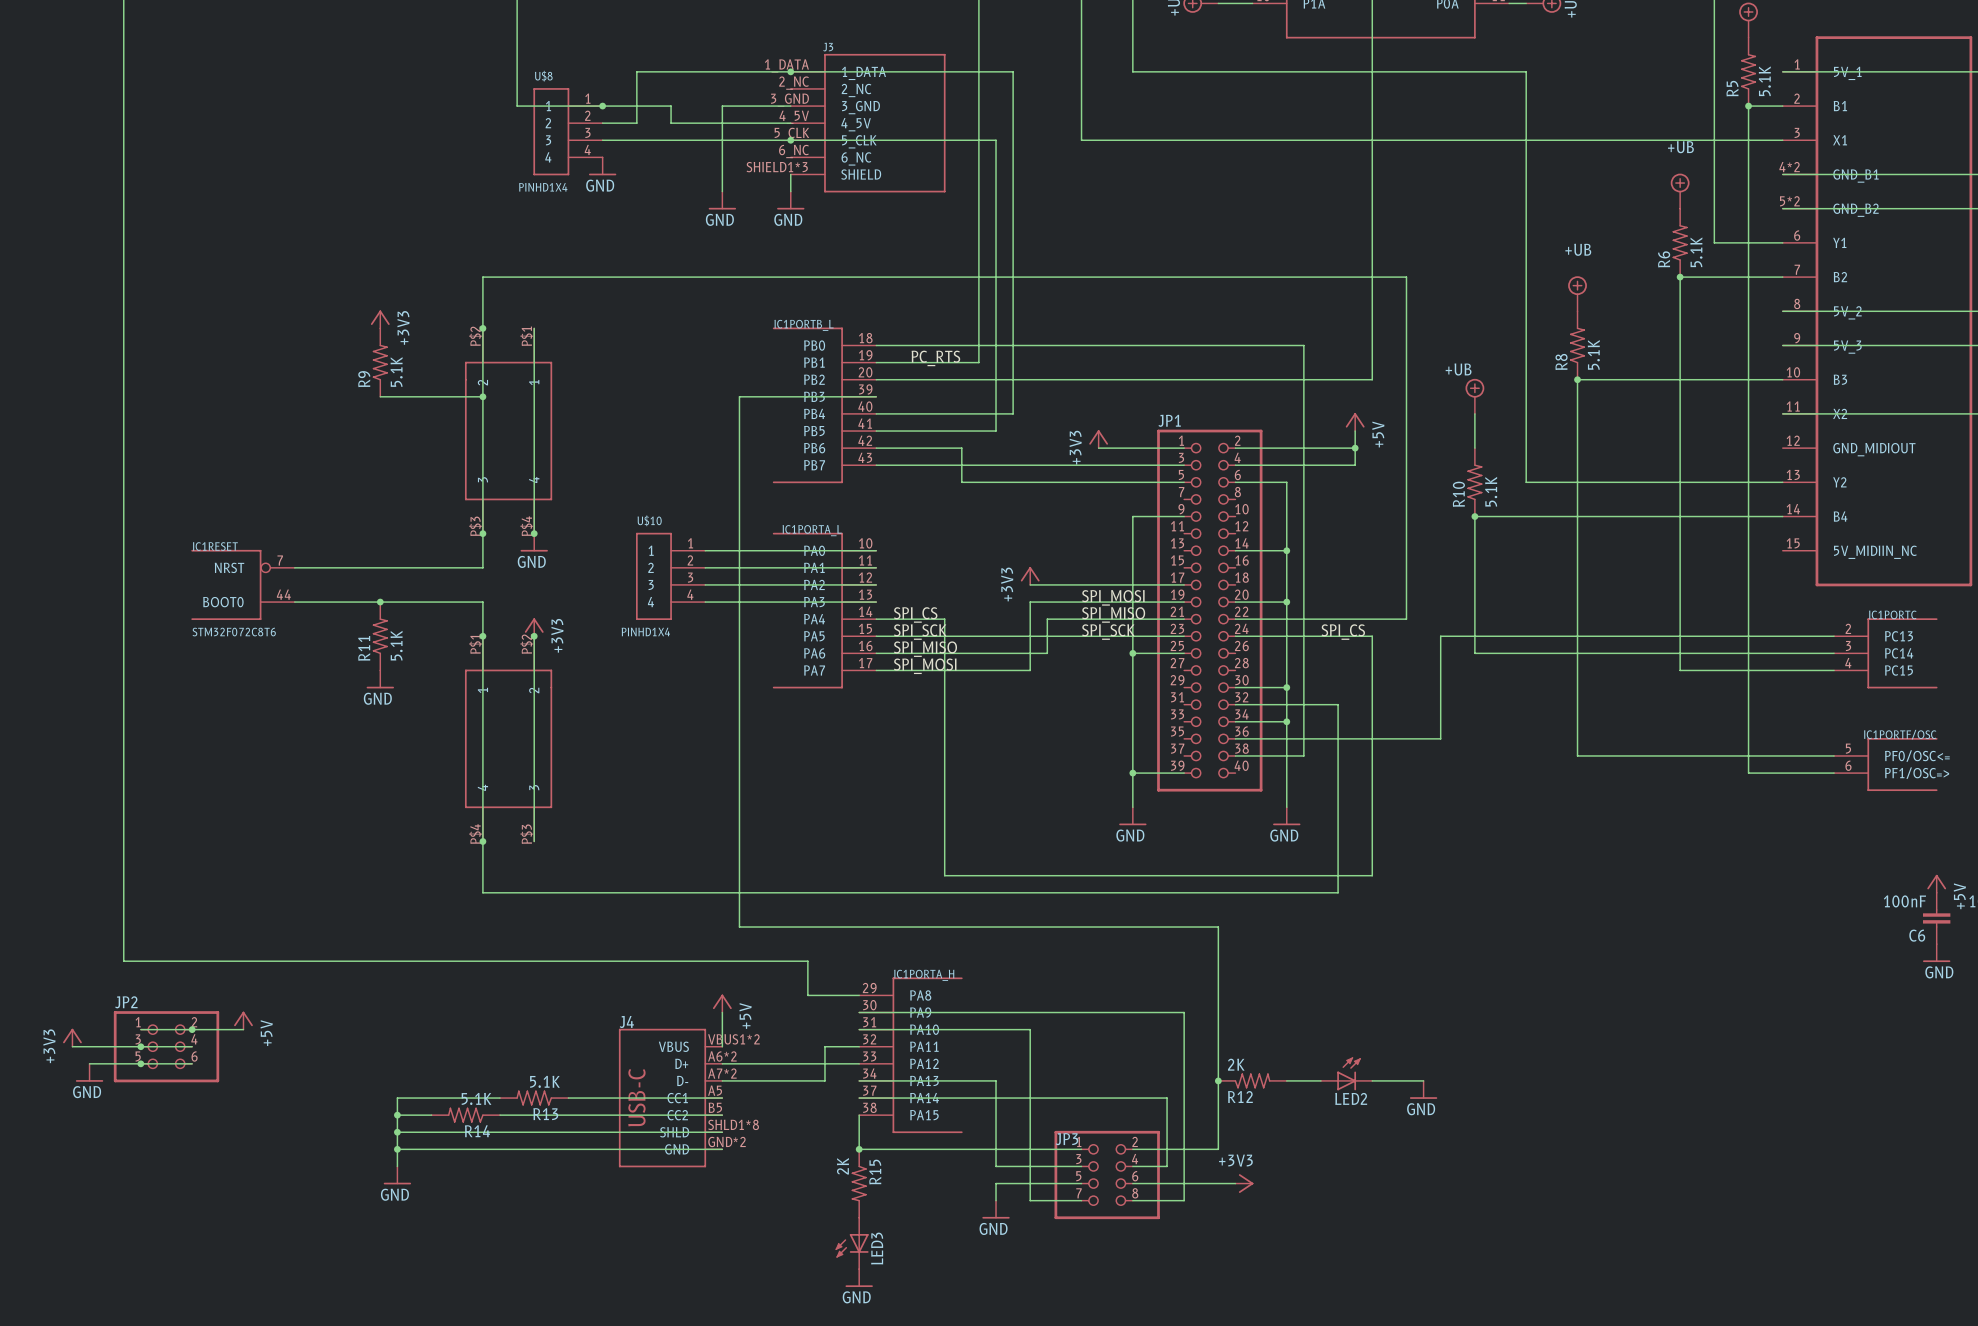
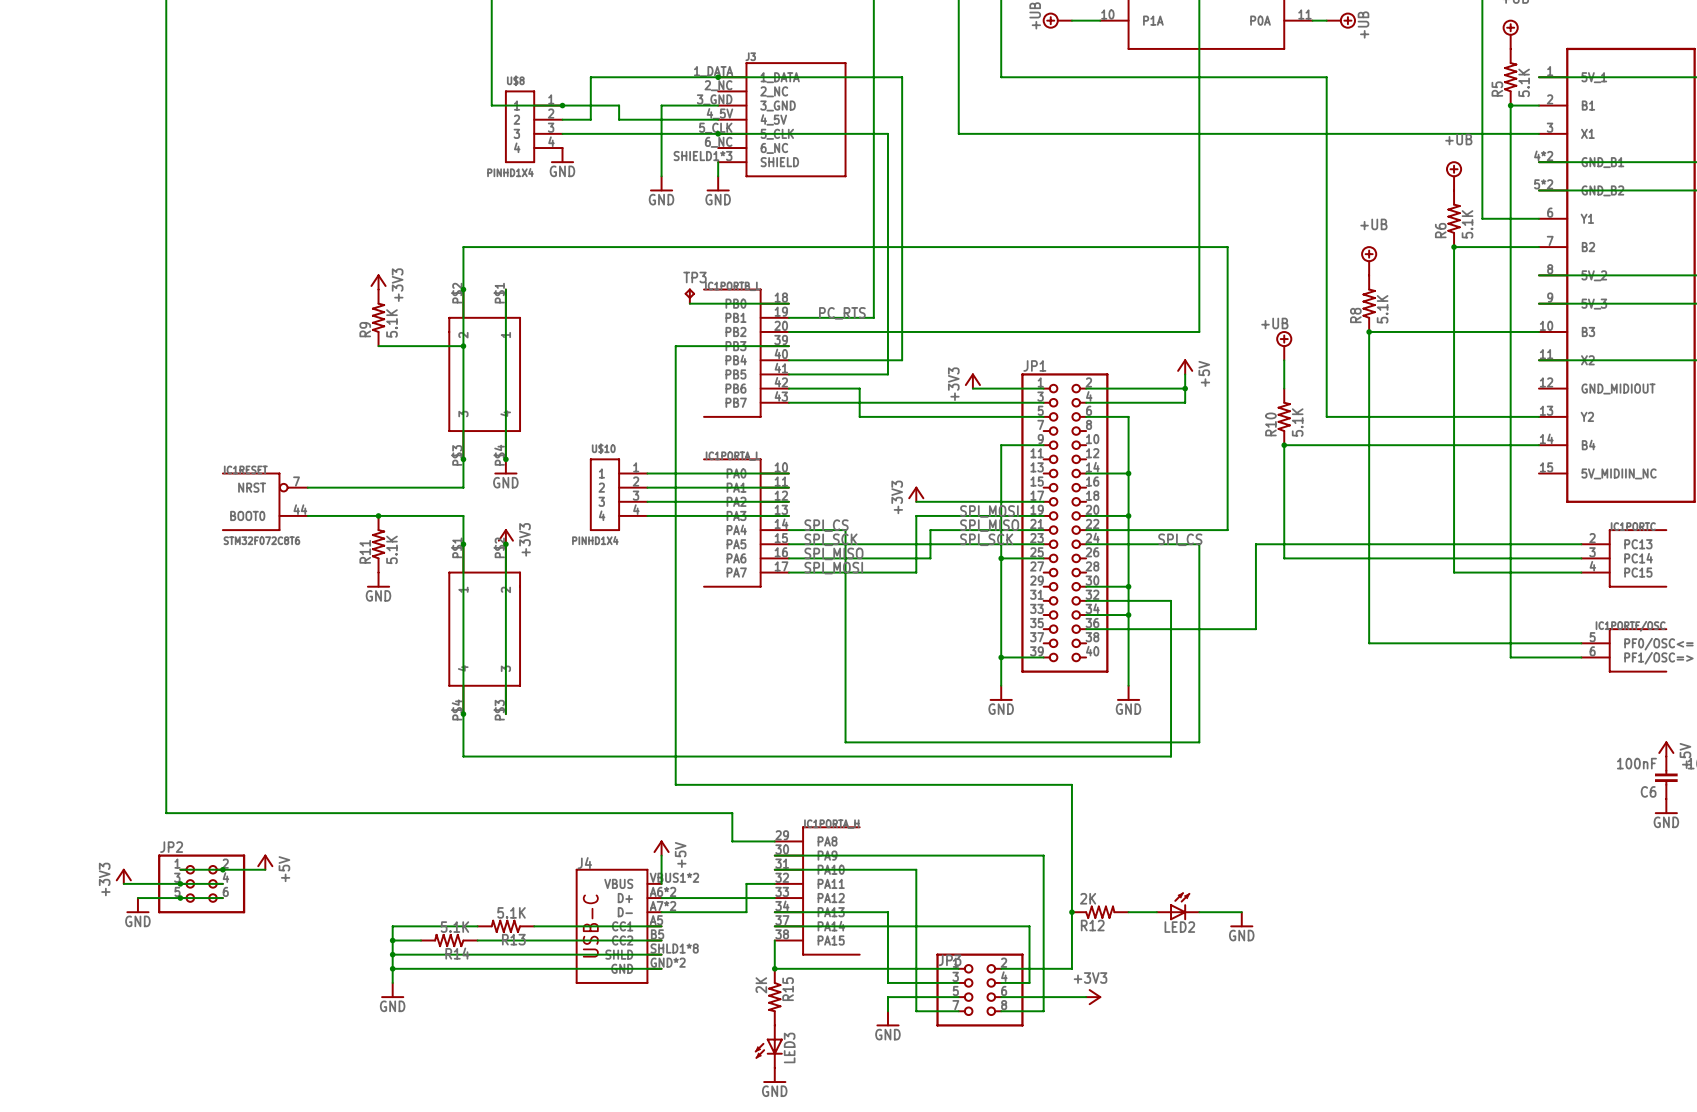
TP3: none -> (689, 296)
wire: (876, 345) (1303, 345) (1303, 755) (1235, 755) -> (788, 303) (689, 303)

